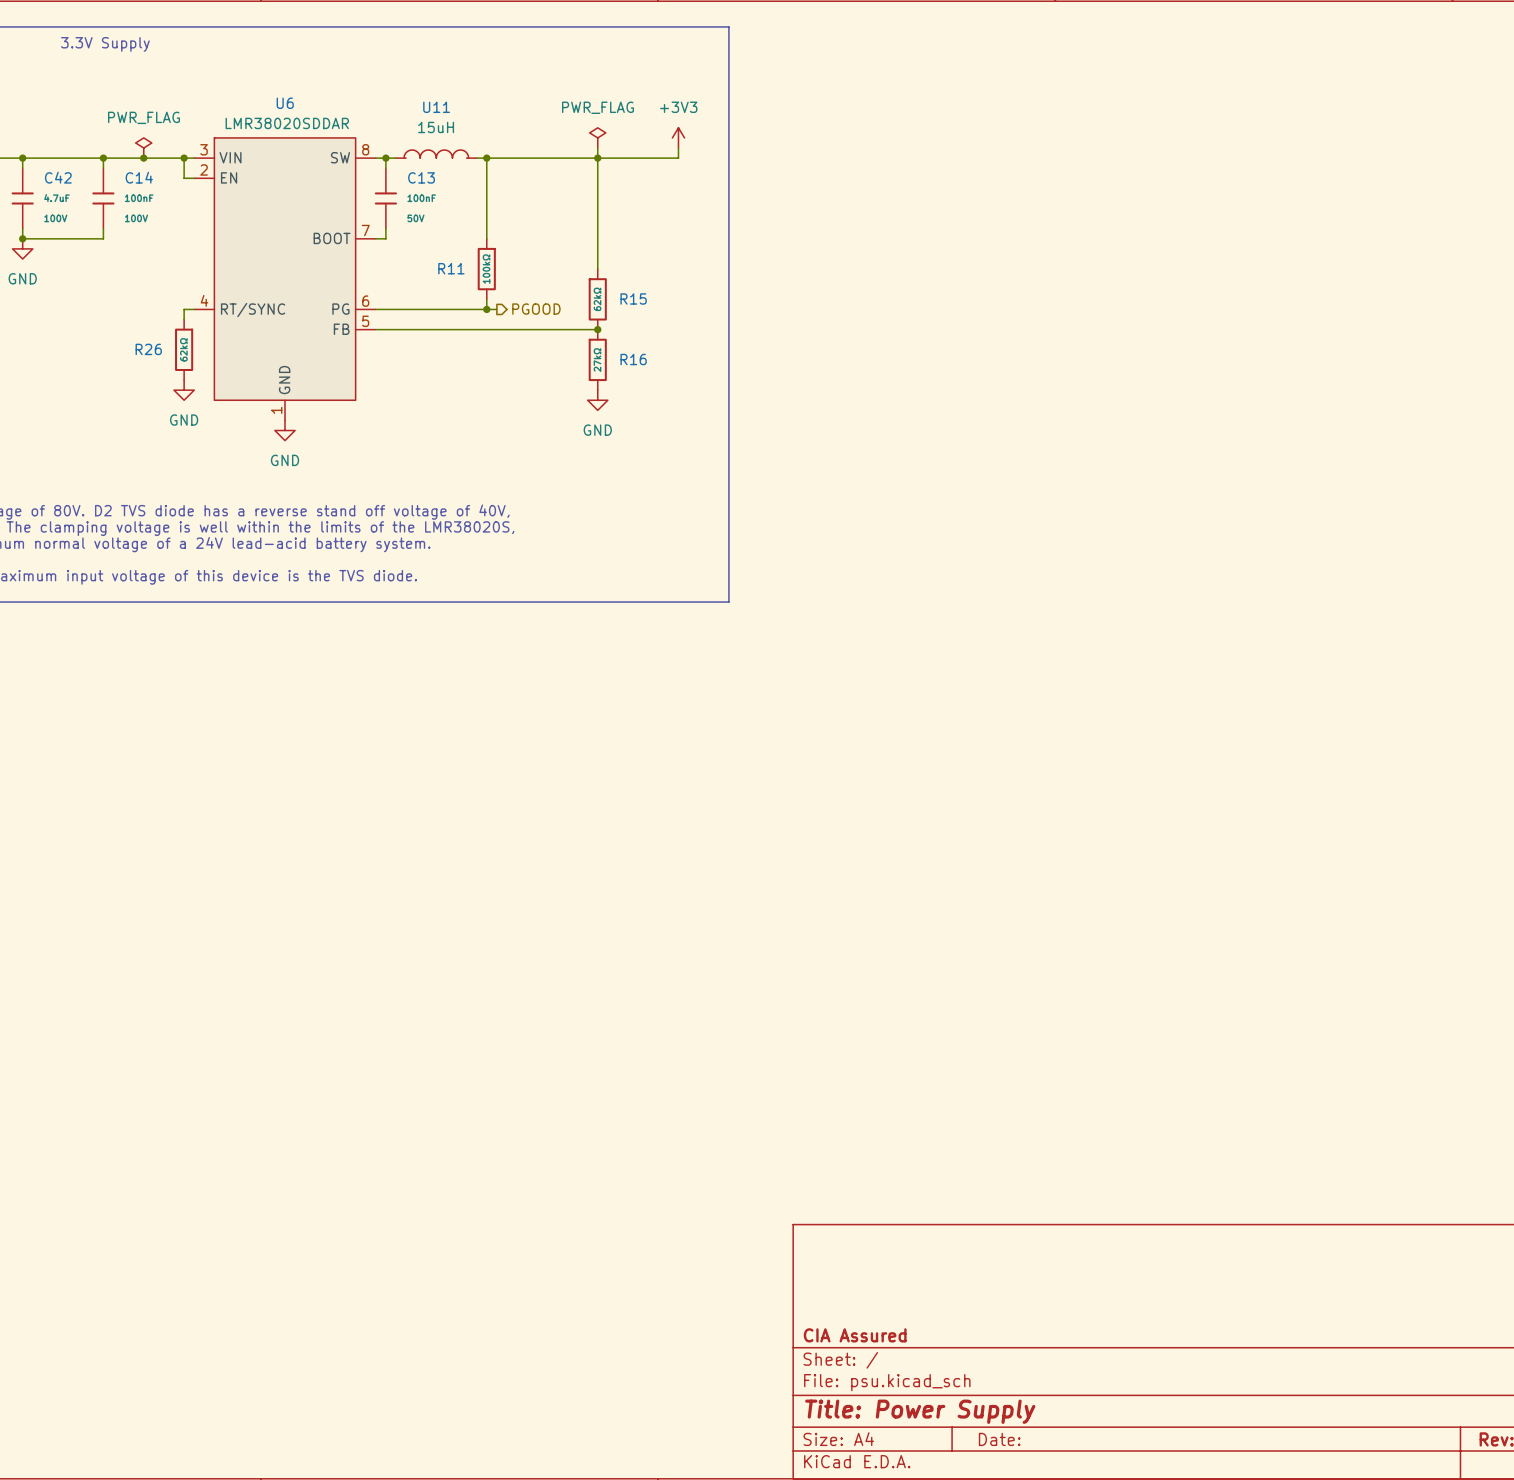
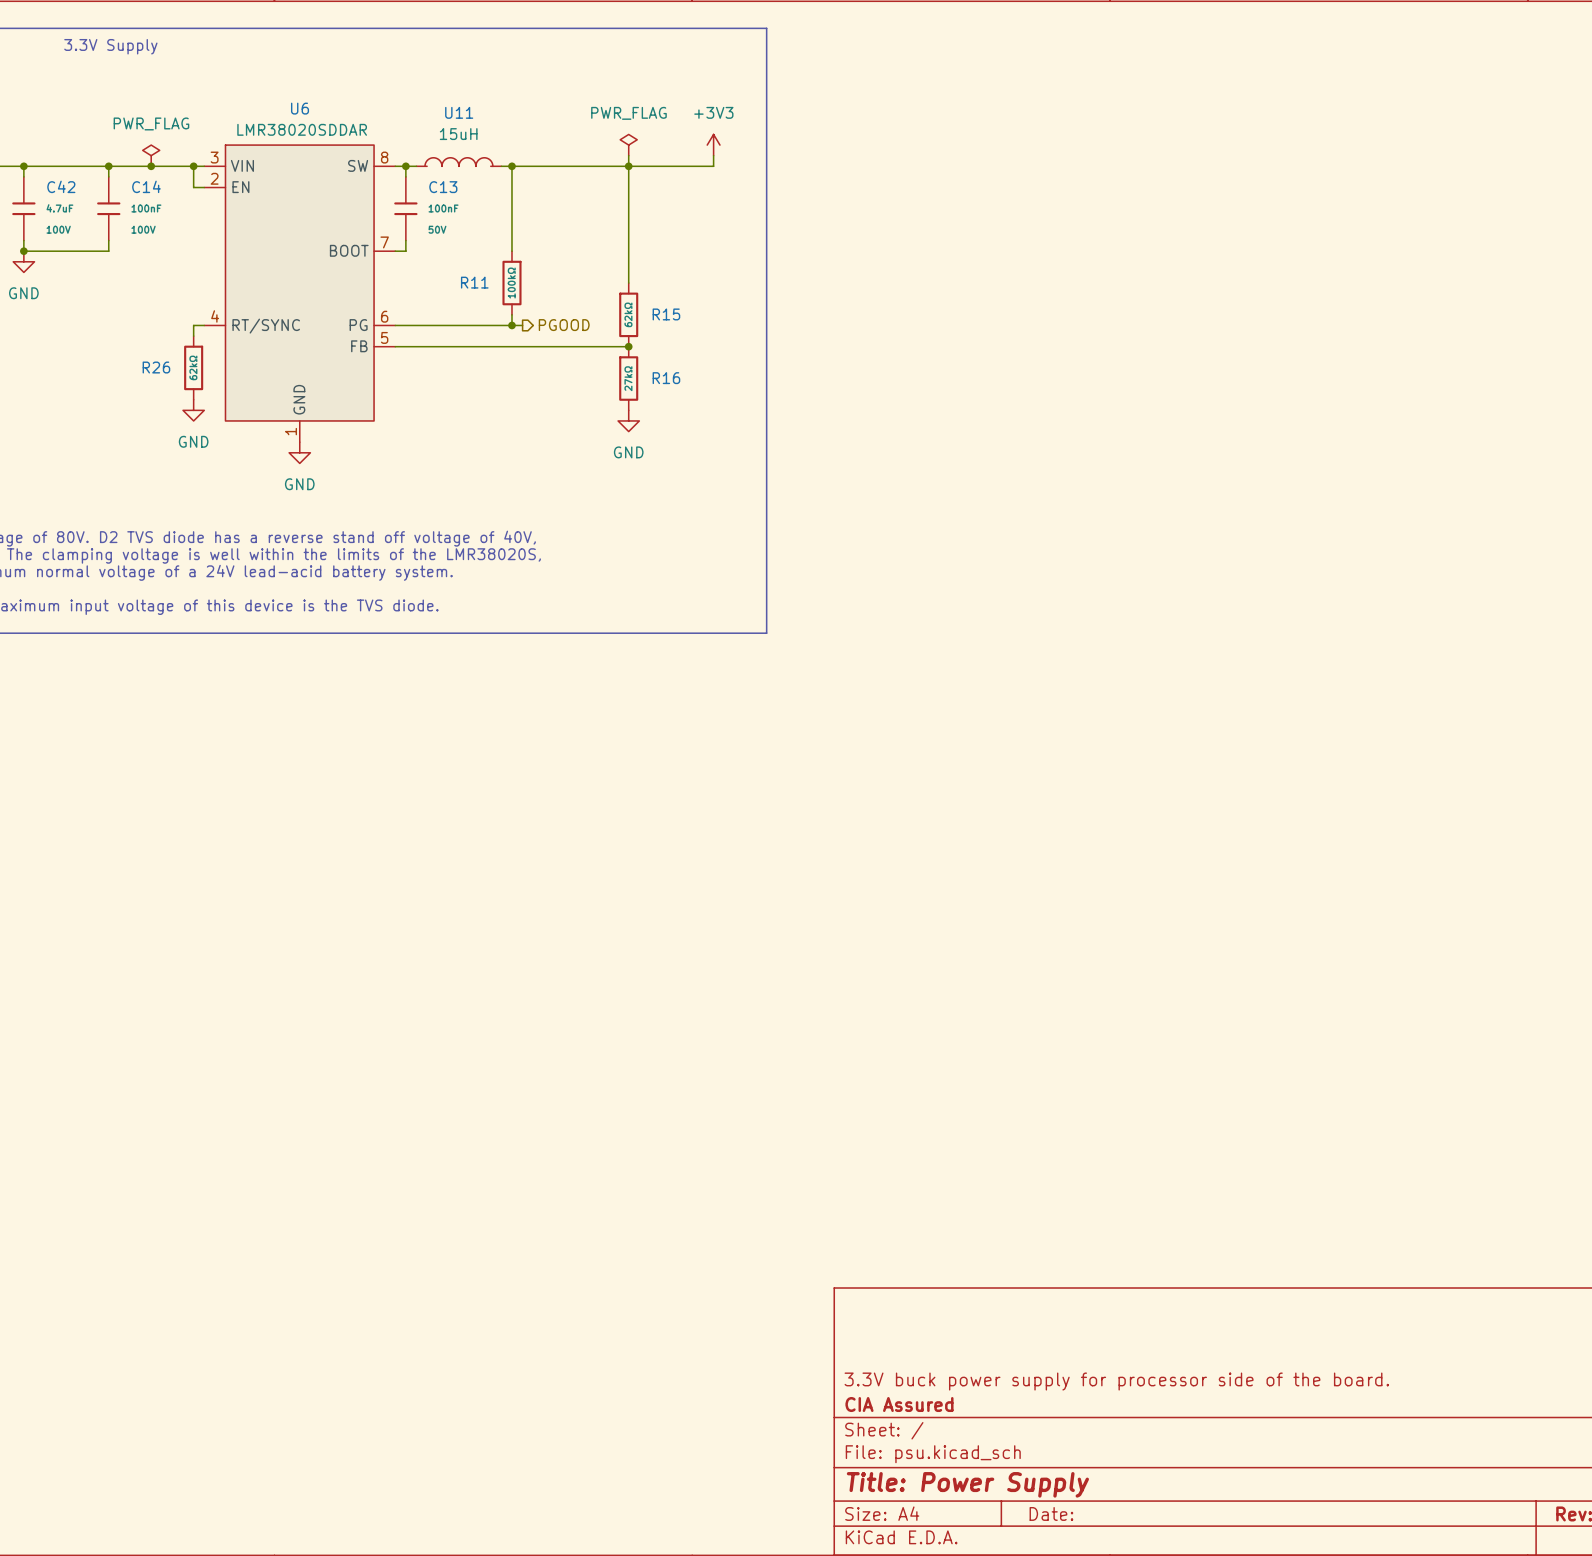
title block: none -> 3.3V buck power supply for processor side of the board. (1116, 1381)

